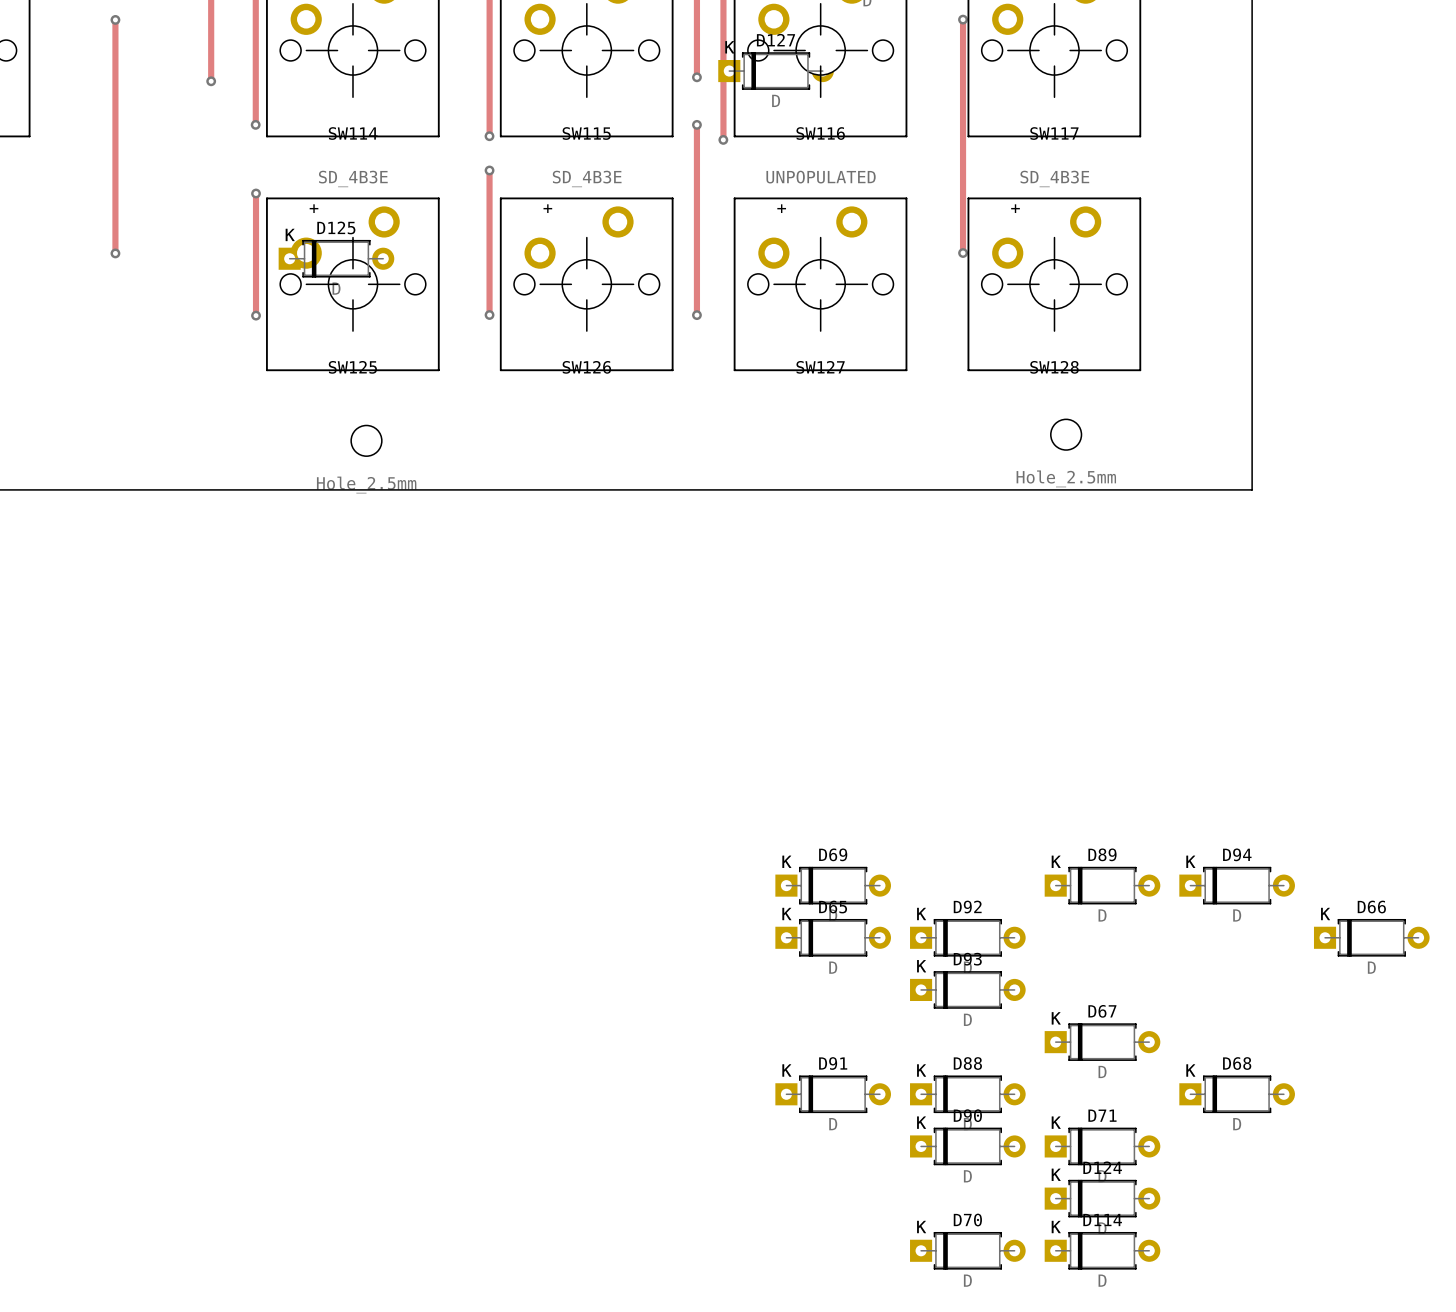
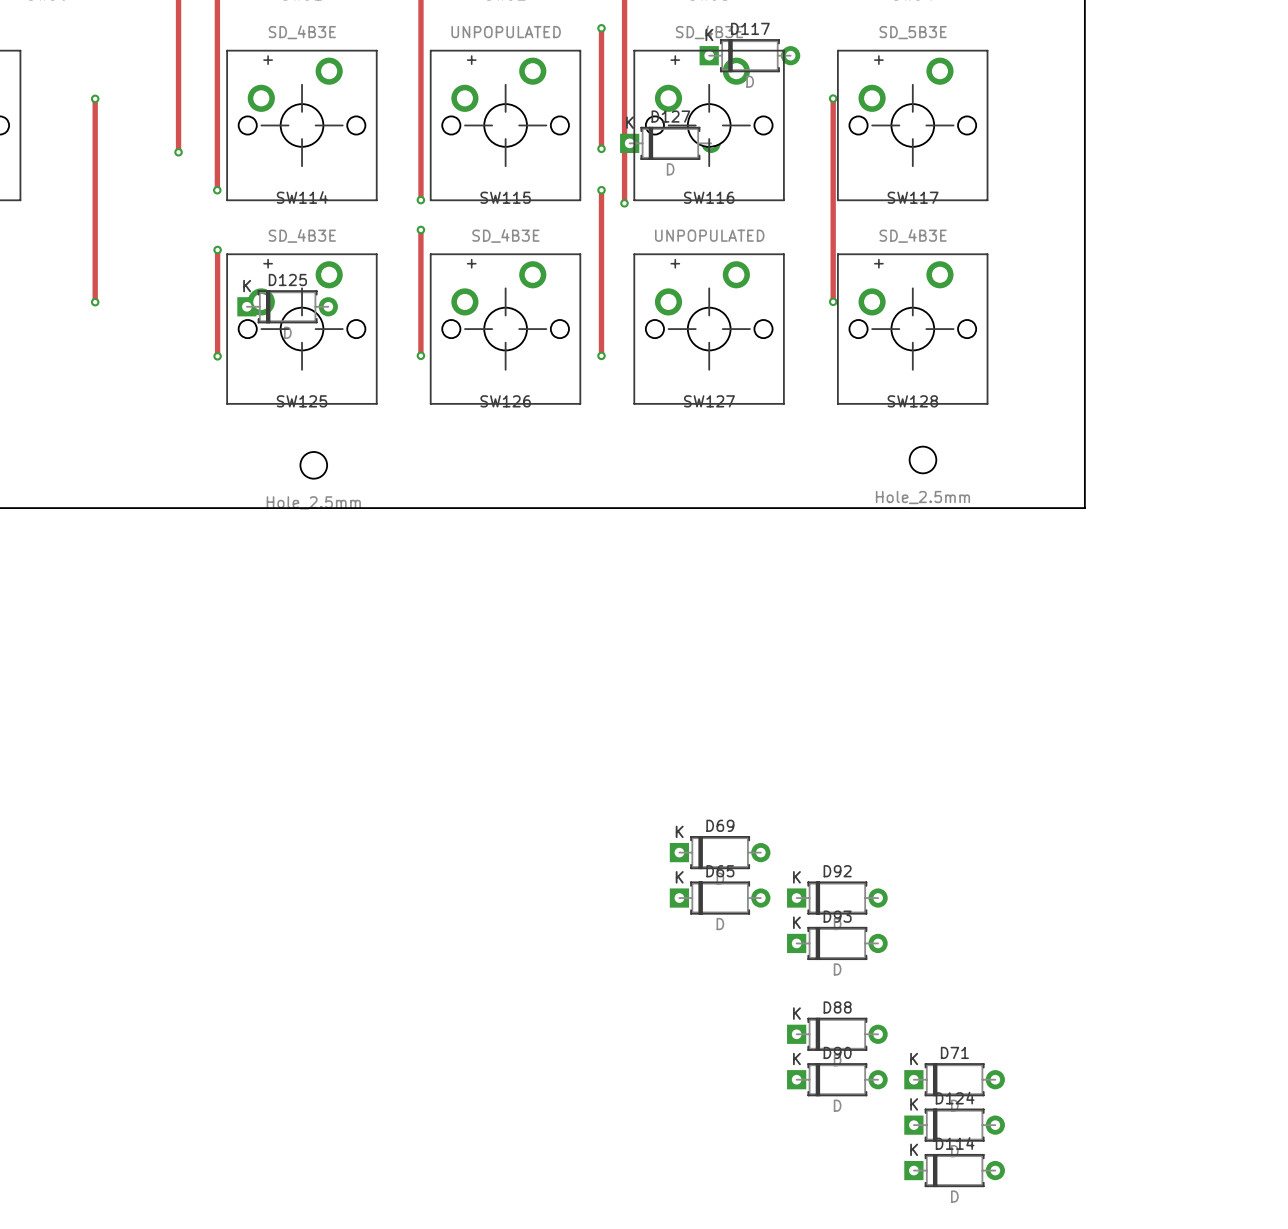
D89: D (1102, 885) -> none
D94: D (1237, 885) -> none
D66: D (1371, 937) -> none
D67: D (1102, 1042) -> none
D91: D (833, 1094) -> none
D68: D (1237, 1094) -> none
D70: D (967, 1250) -> none

